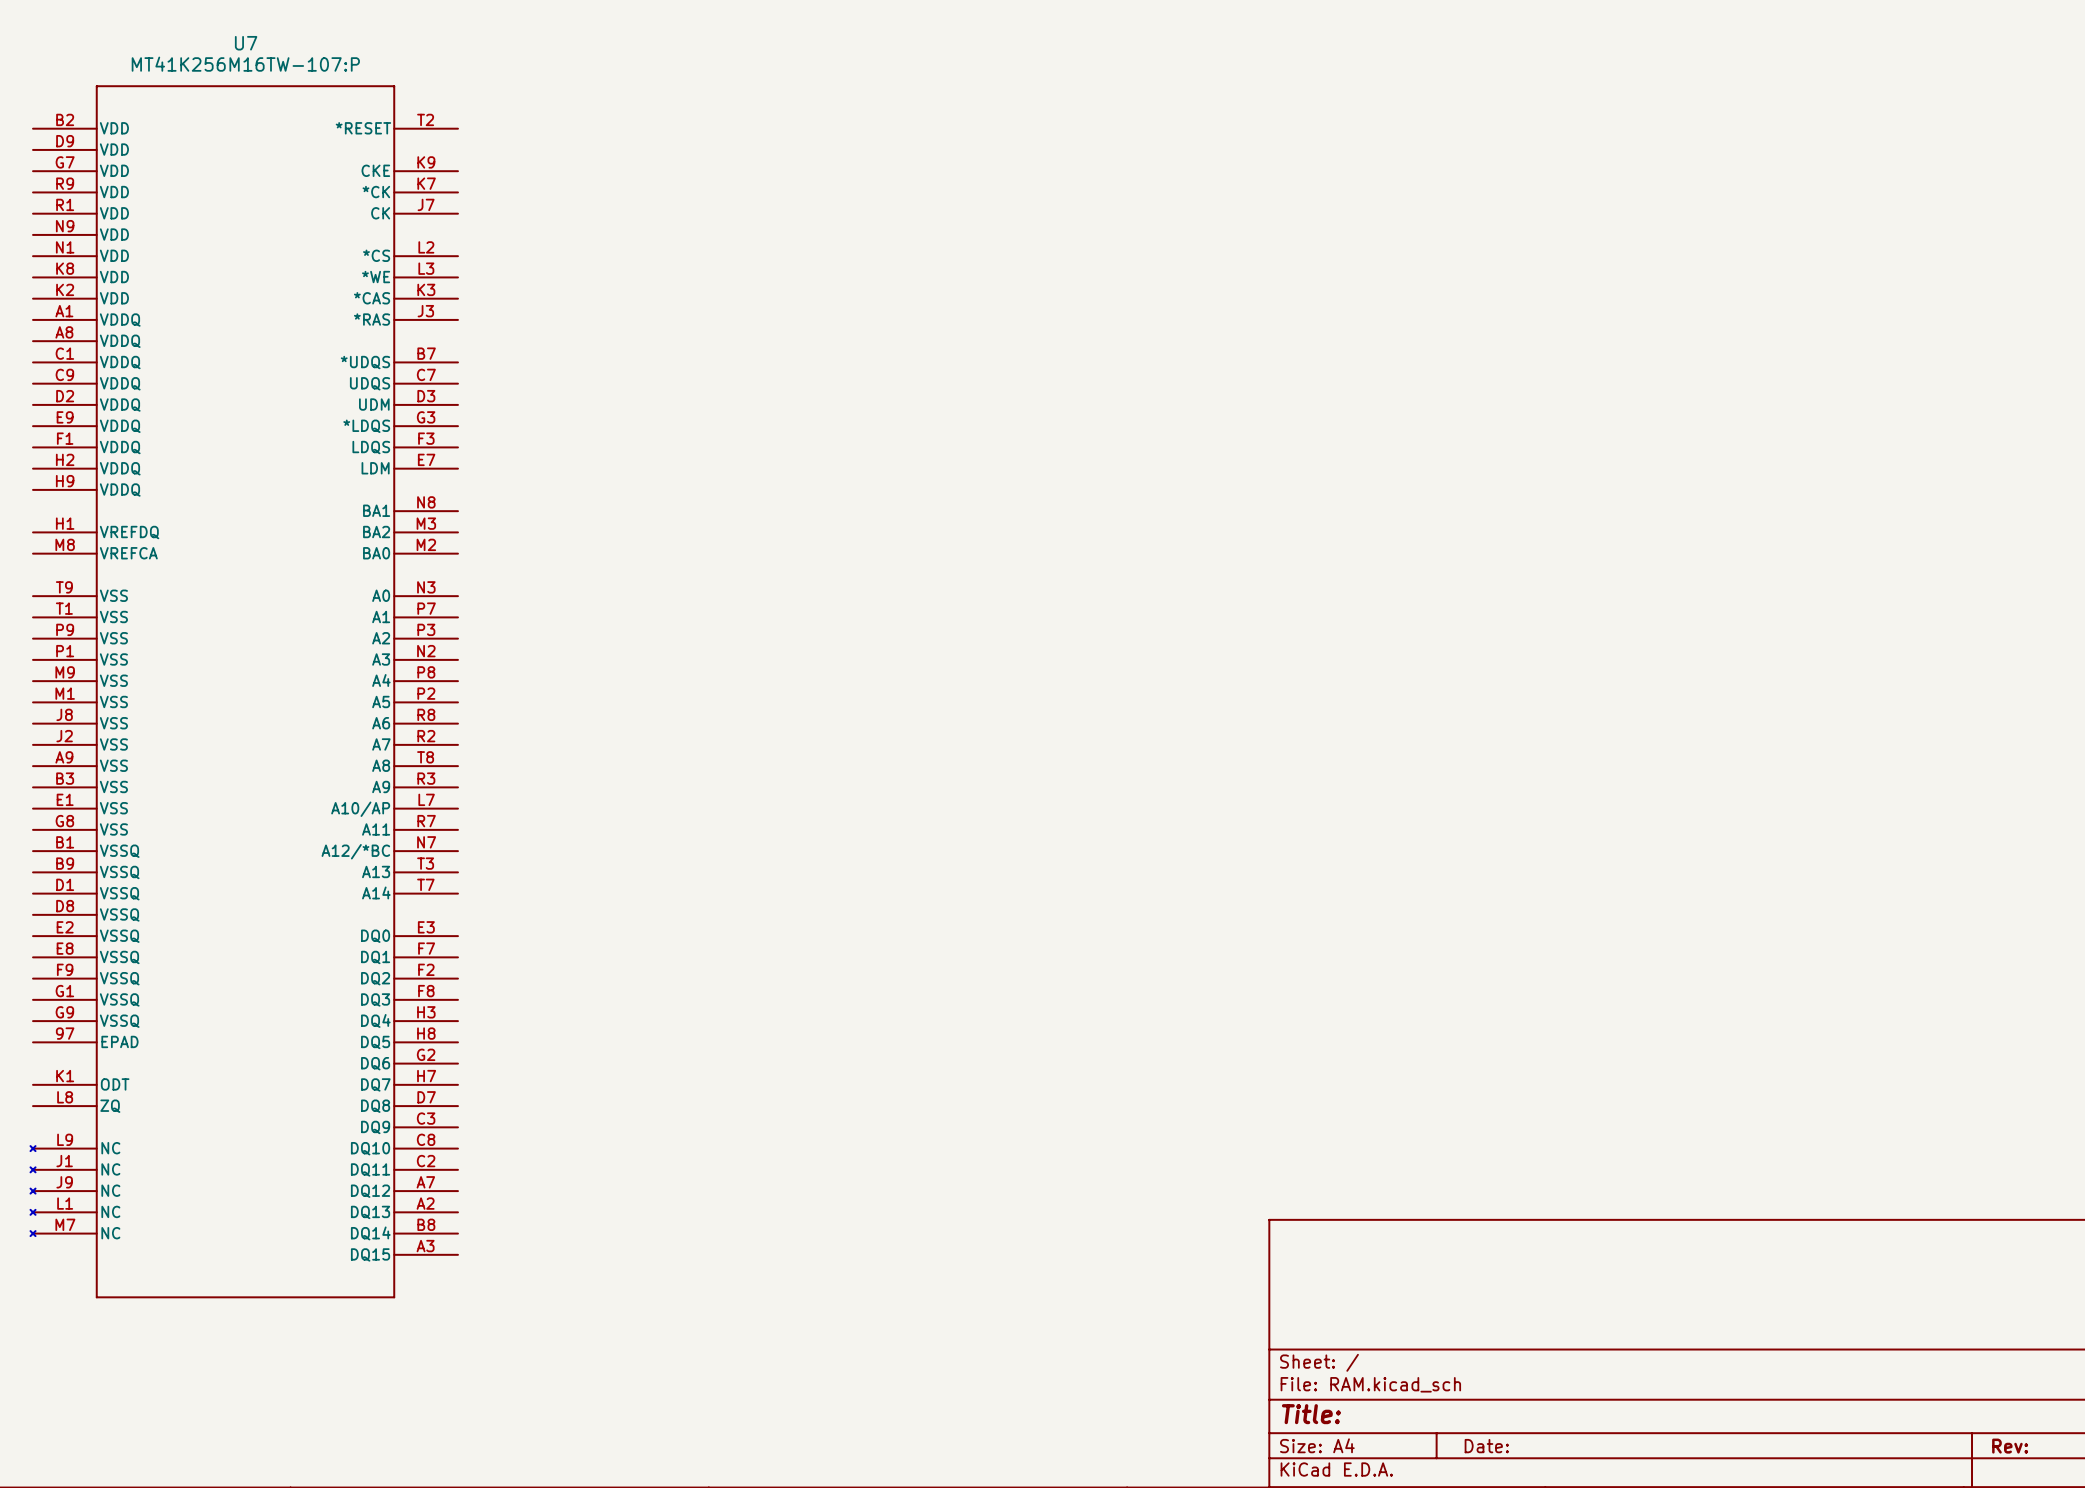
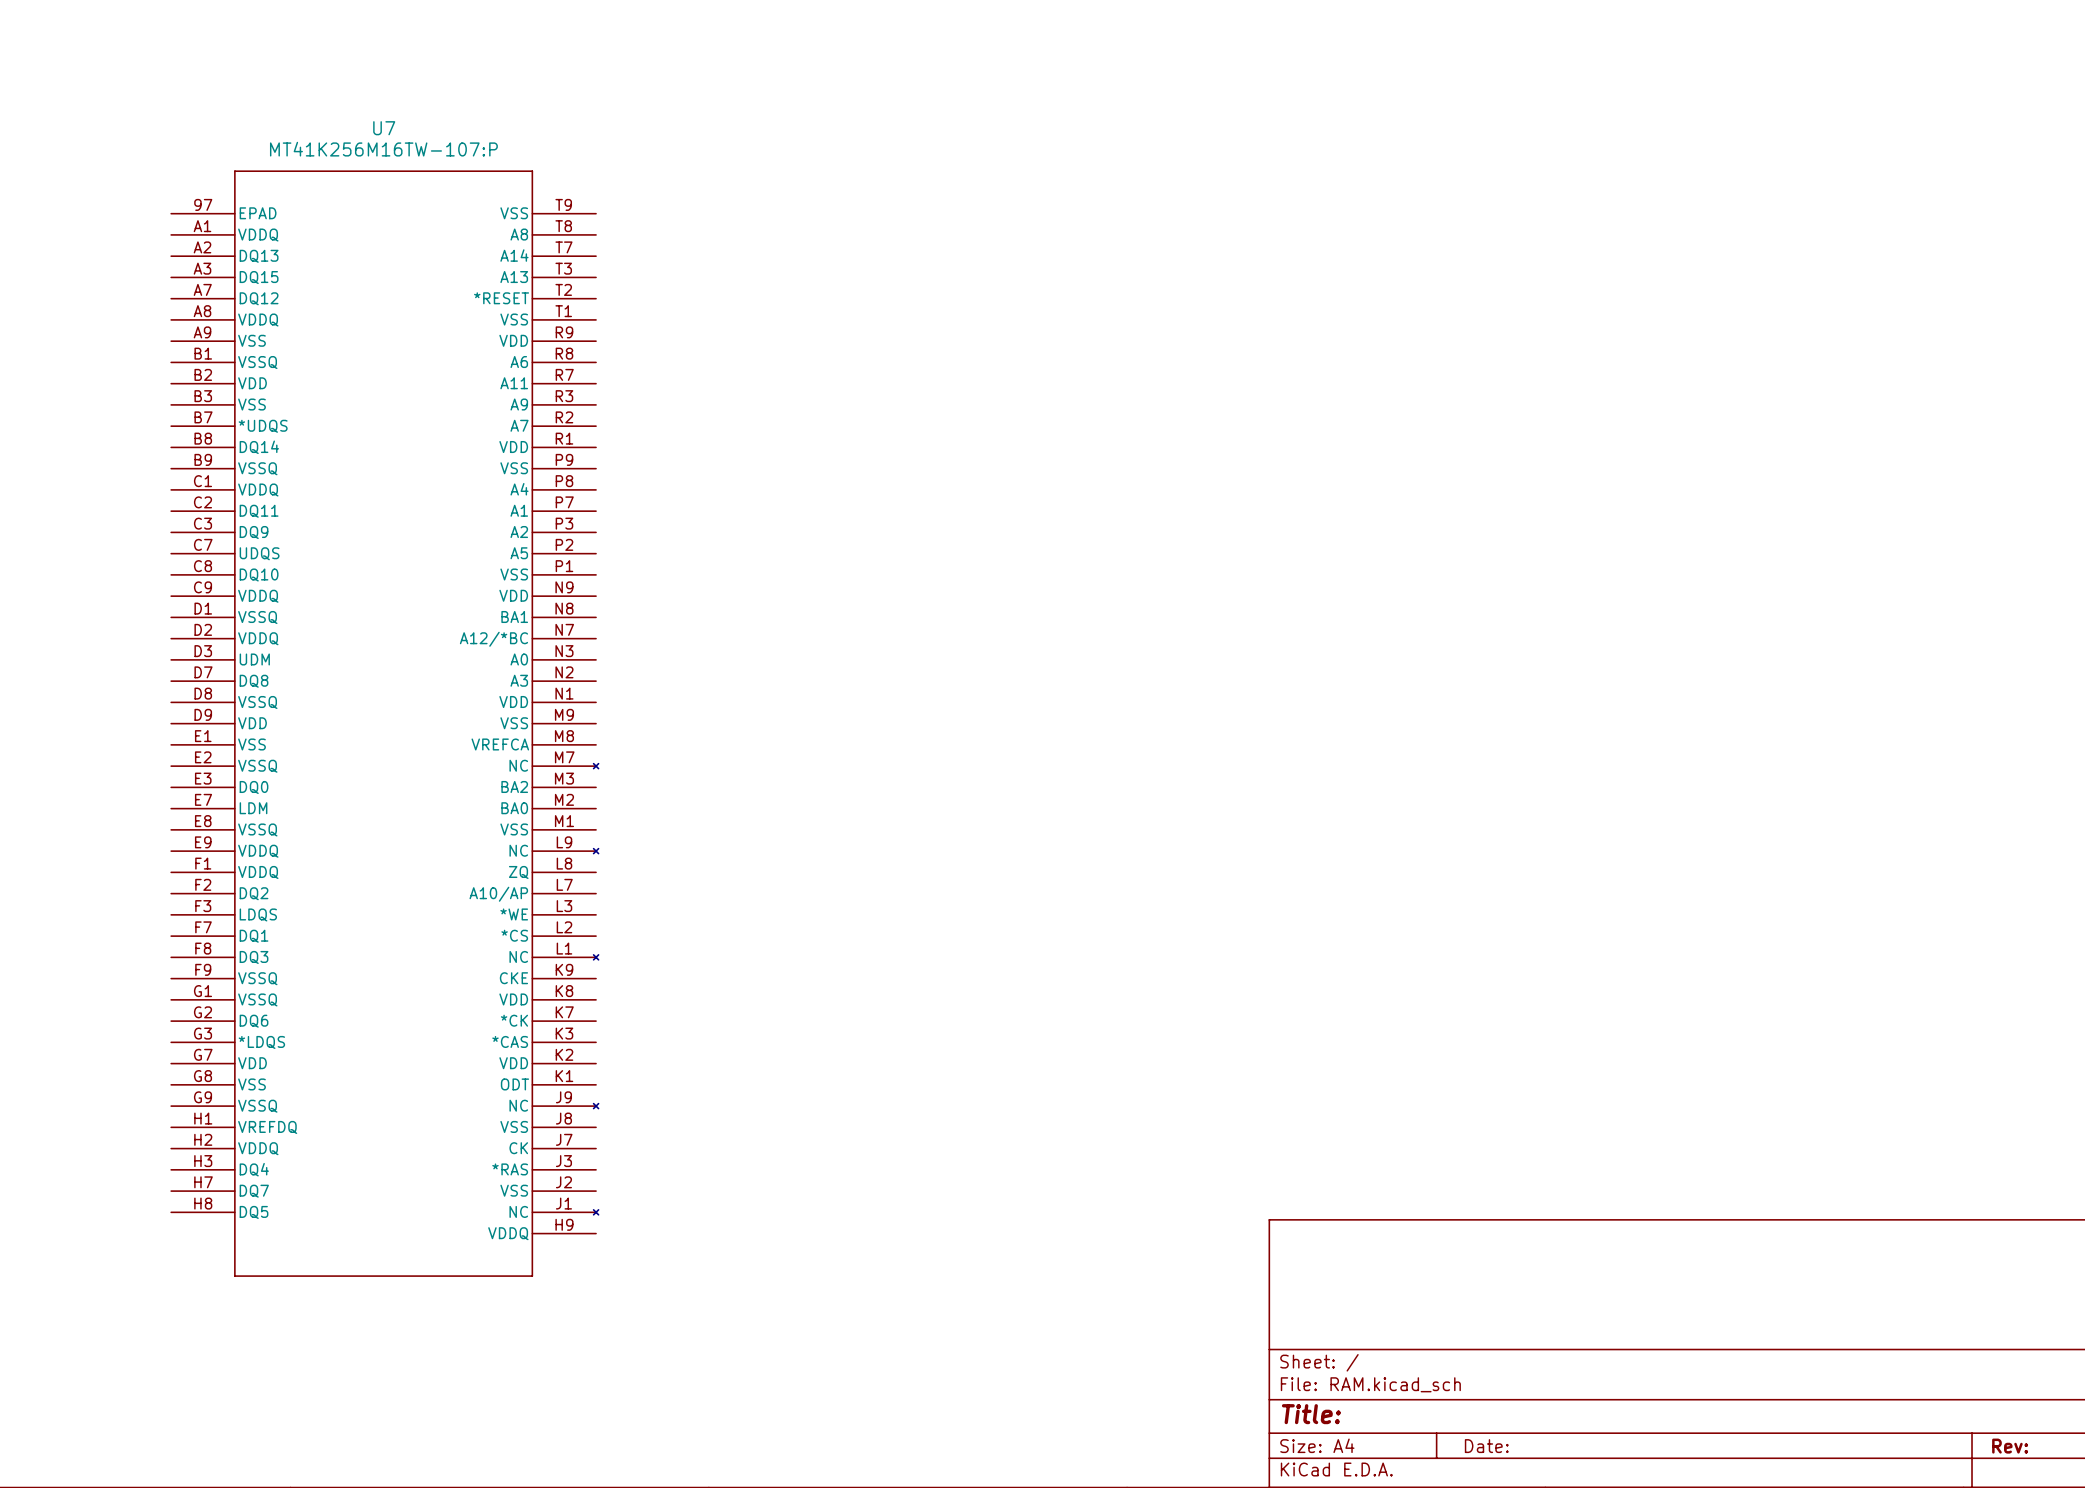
U7 name position: U7 (246, 43) -> U7 (384, 128)
U7 value position: MT41K256M16TW-107:P (245, 64) -> MT41K256M16TW-107:P (383, 149)
U7 symbol: [30, 85, 458, 1298] -> [171, 170, 599, 1277]

